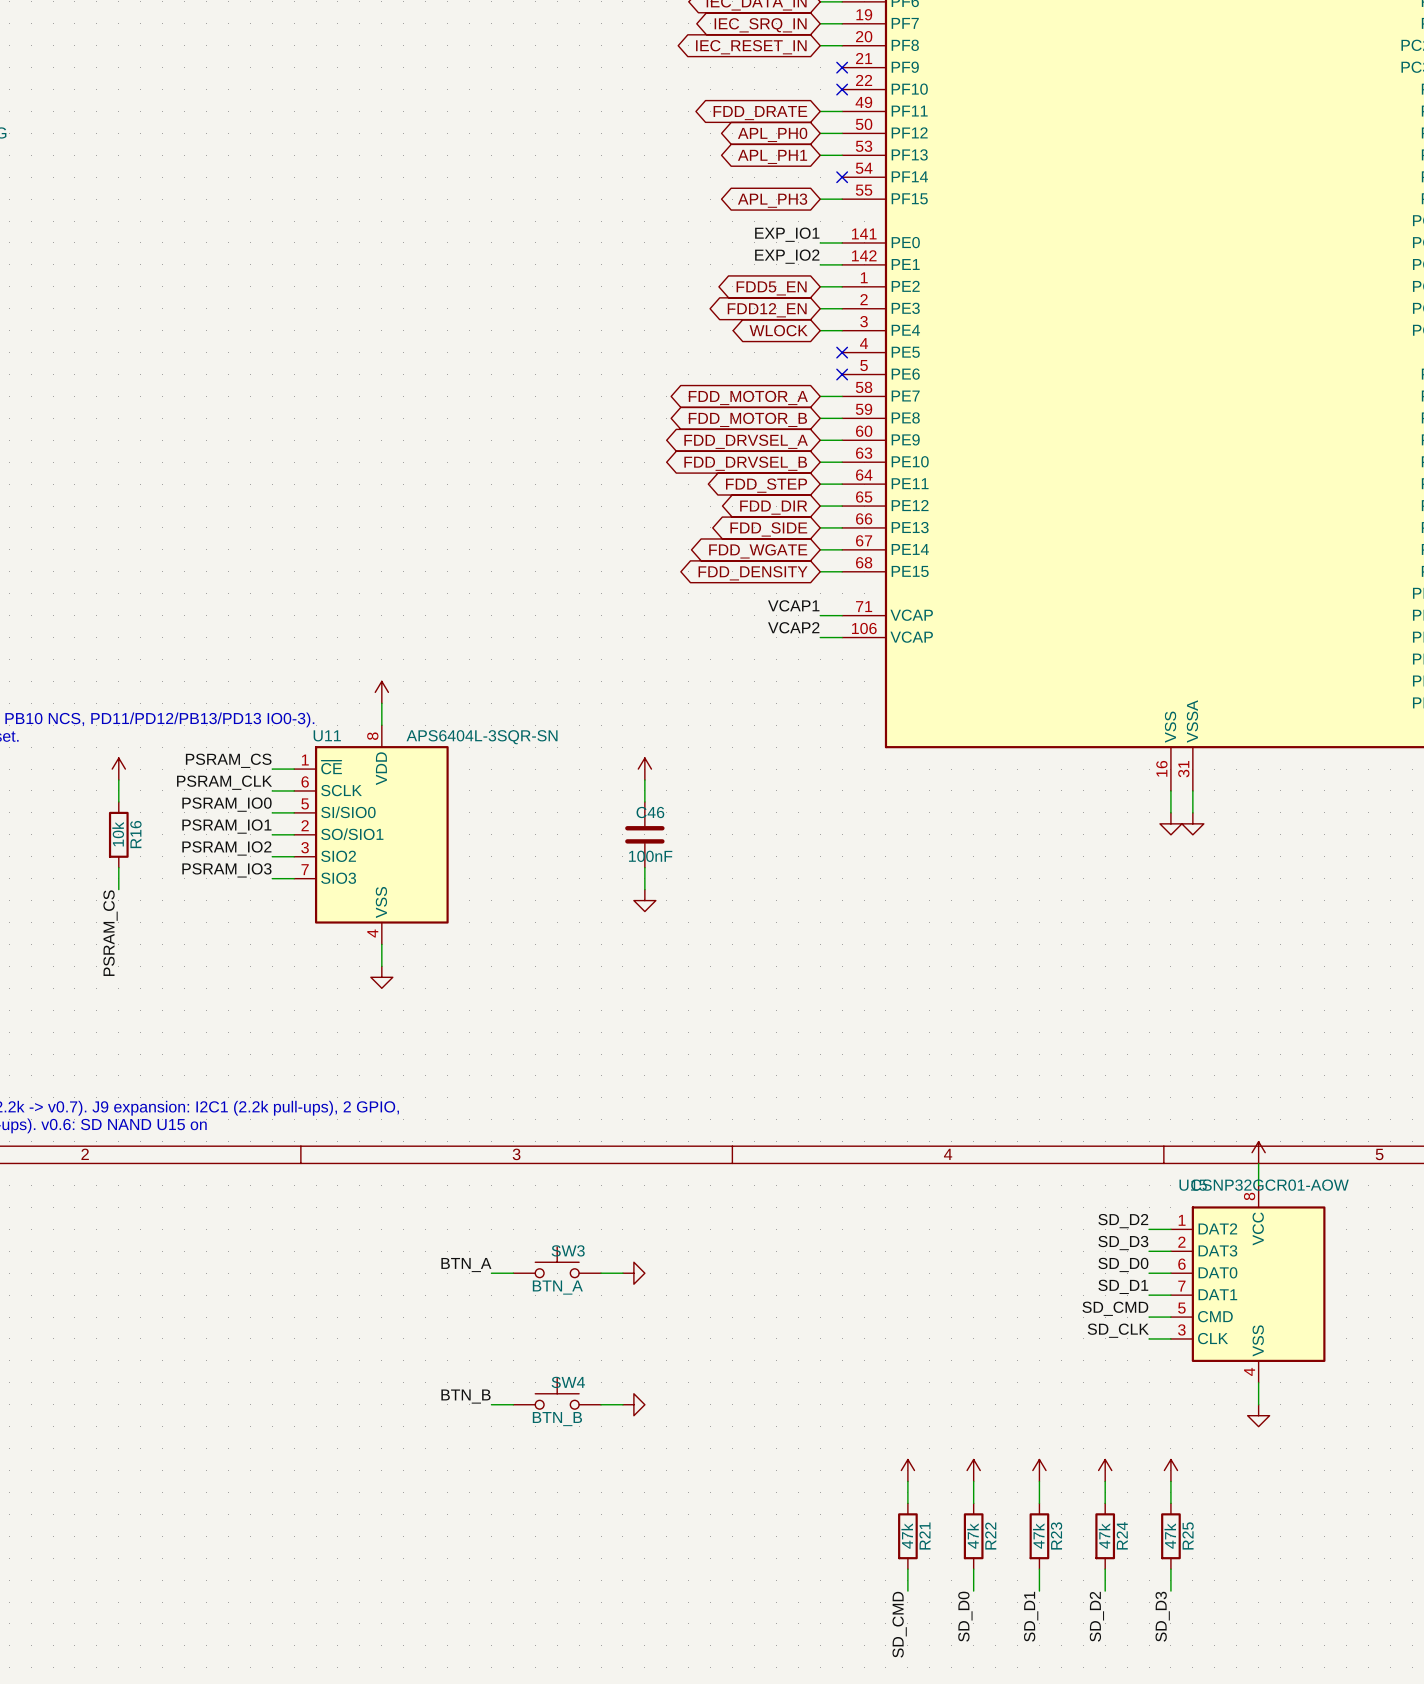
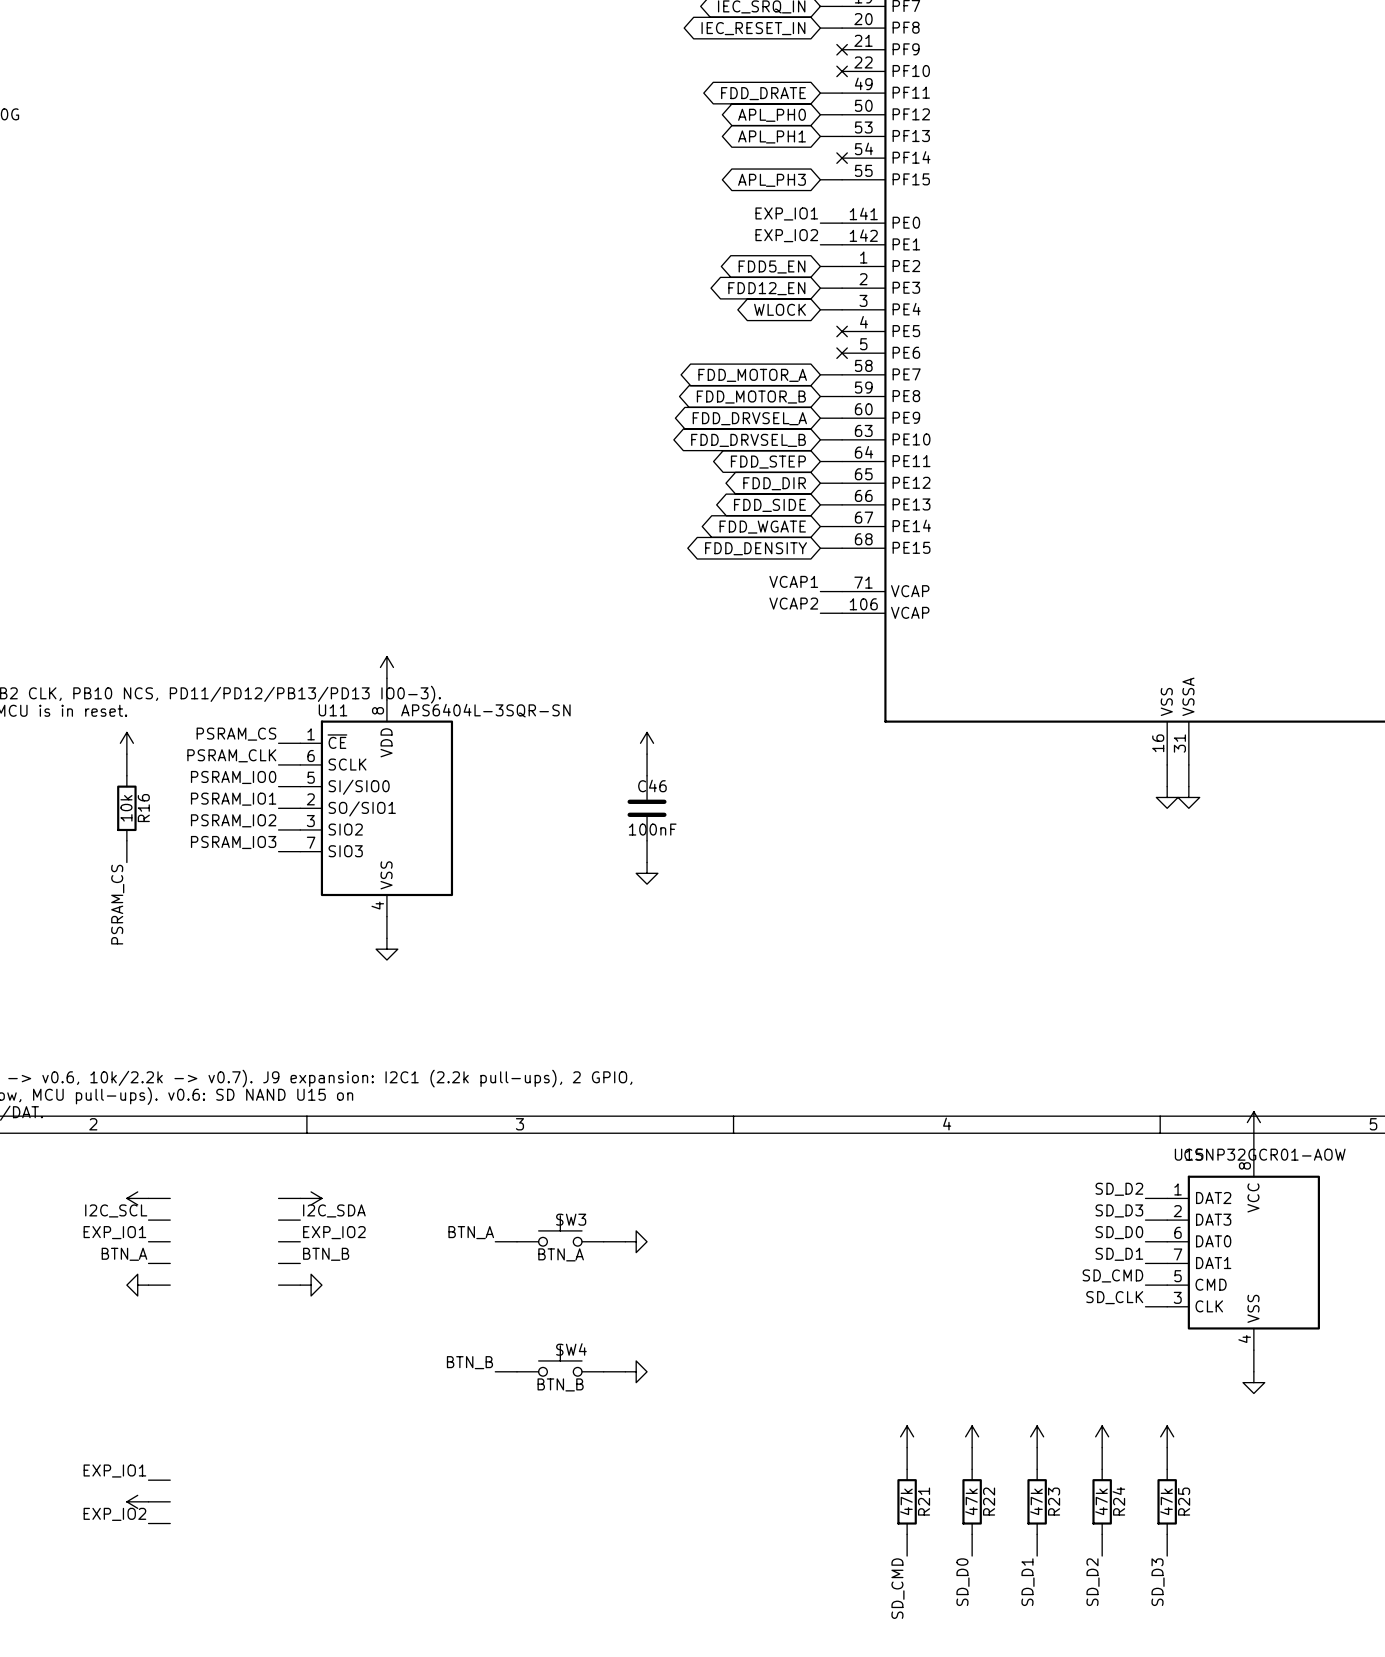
power symbol: none -> (137, 1198)
wire: none -> (148, 1198) (170, 1198)
wire: none -> (278, 1198) (300, 1198)
power symbol: none -> (311, 1198)
label: none -> I2C_SCL (116, 1210)
label: none -> I2C_SDA (334, 1210)
wire: none -> (148, 1220) (170, 1220)
wire: none -> (278, 1220) (300, 1220)
label: none -> EXP_IO1 (114, 1232)
label: none -> EXP_IO2 (334, 1232)
wire: none -> (148, 1241) (170, 1241)
wire: none -> (278, 1241) (300, 1241)
label: none -> BTN_A (124, 1254)
label: none -> BTN_B (326, 1254)
wire: none -> (148, 1263) (170, 1263)
wire: none -> (278, 1263) (300, 1263)
power symbol: none -> (137, 1285)
wire: none -> (148, 1285) (170, 1285)
wire: none -> (278, 1285) (300, 1285)
power symbol: none -> (311, 1285)
label: none -> EXP_IO1 (114, 1471)
wire: none -> (148, 1480) (170, 1480)
power symbol: none -> (137, 1501)
wire: none -> (148, 1501) (170, 1501)
label: none -> EXP_IO2 (114, 1514)
wire: none -> (148, 1523) (170, 1523)

